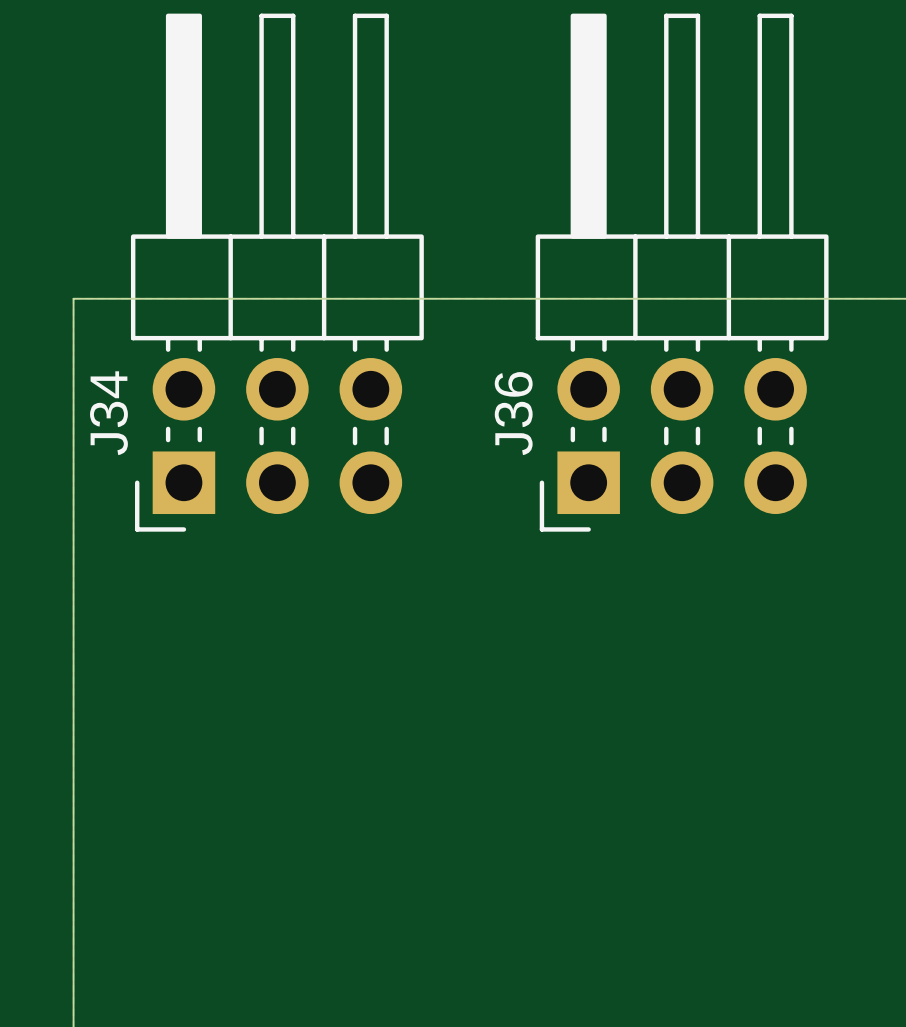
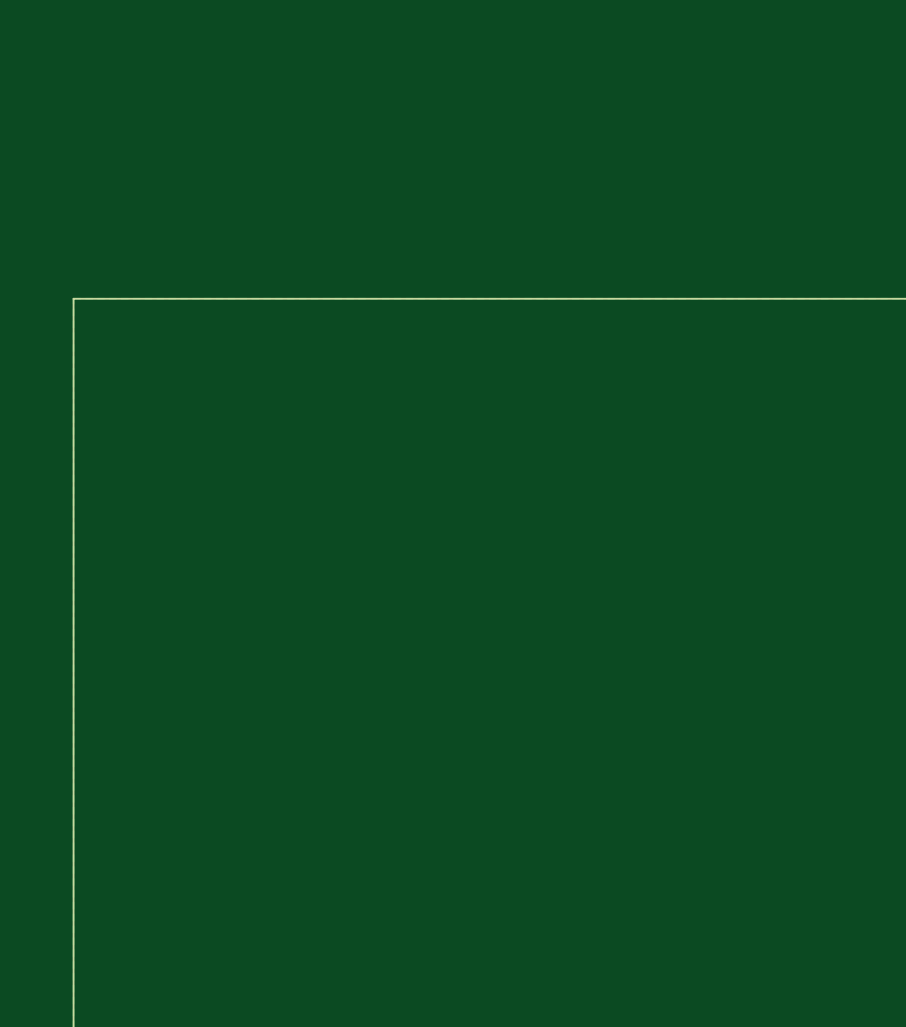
J34: (277, 272) -> none
J36: (682, 272) -> none

